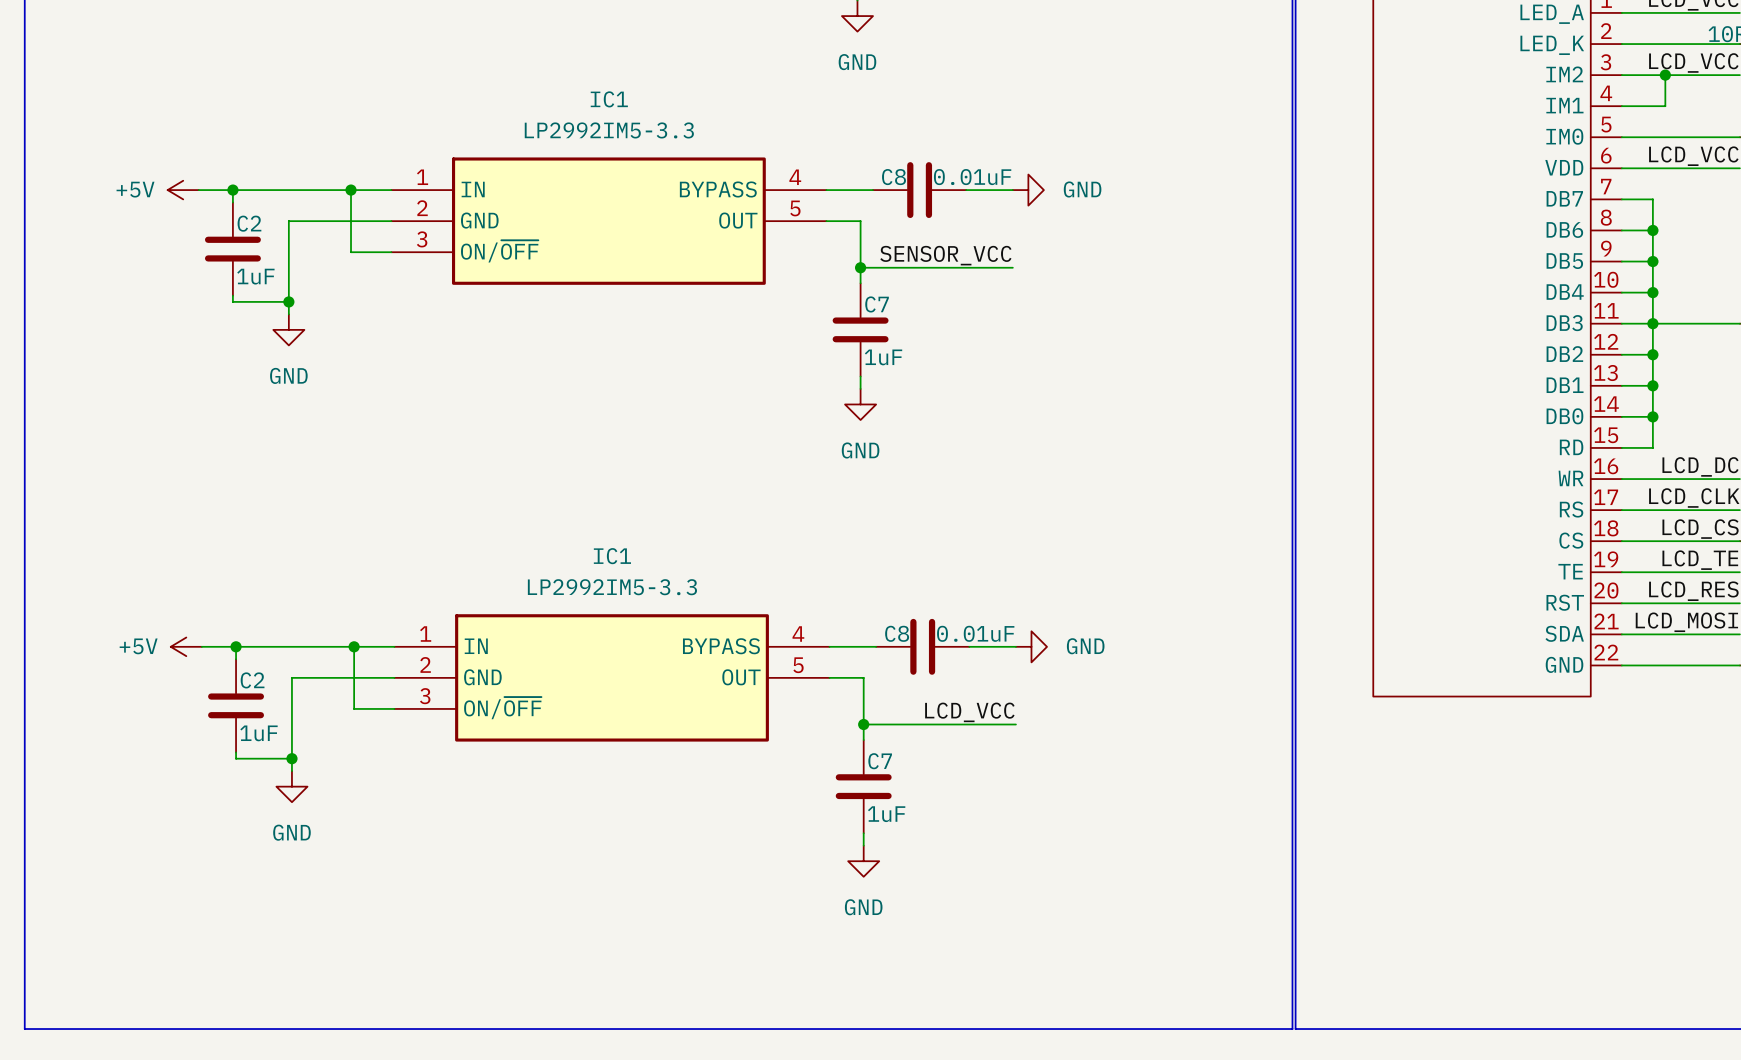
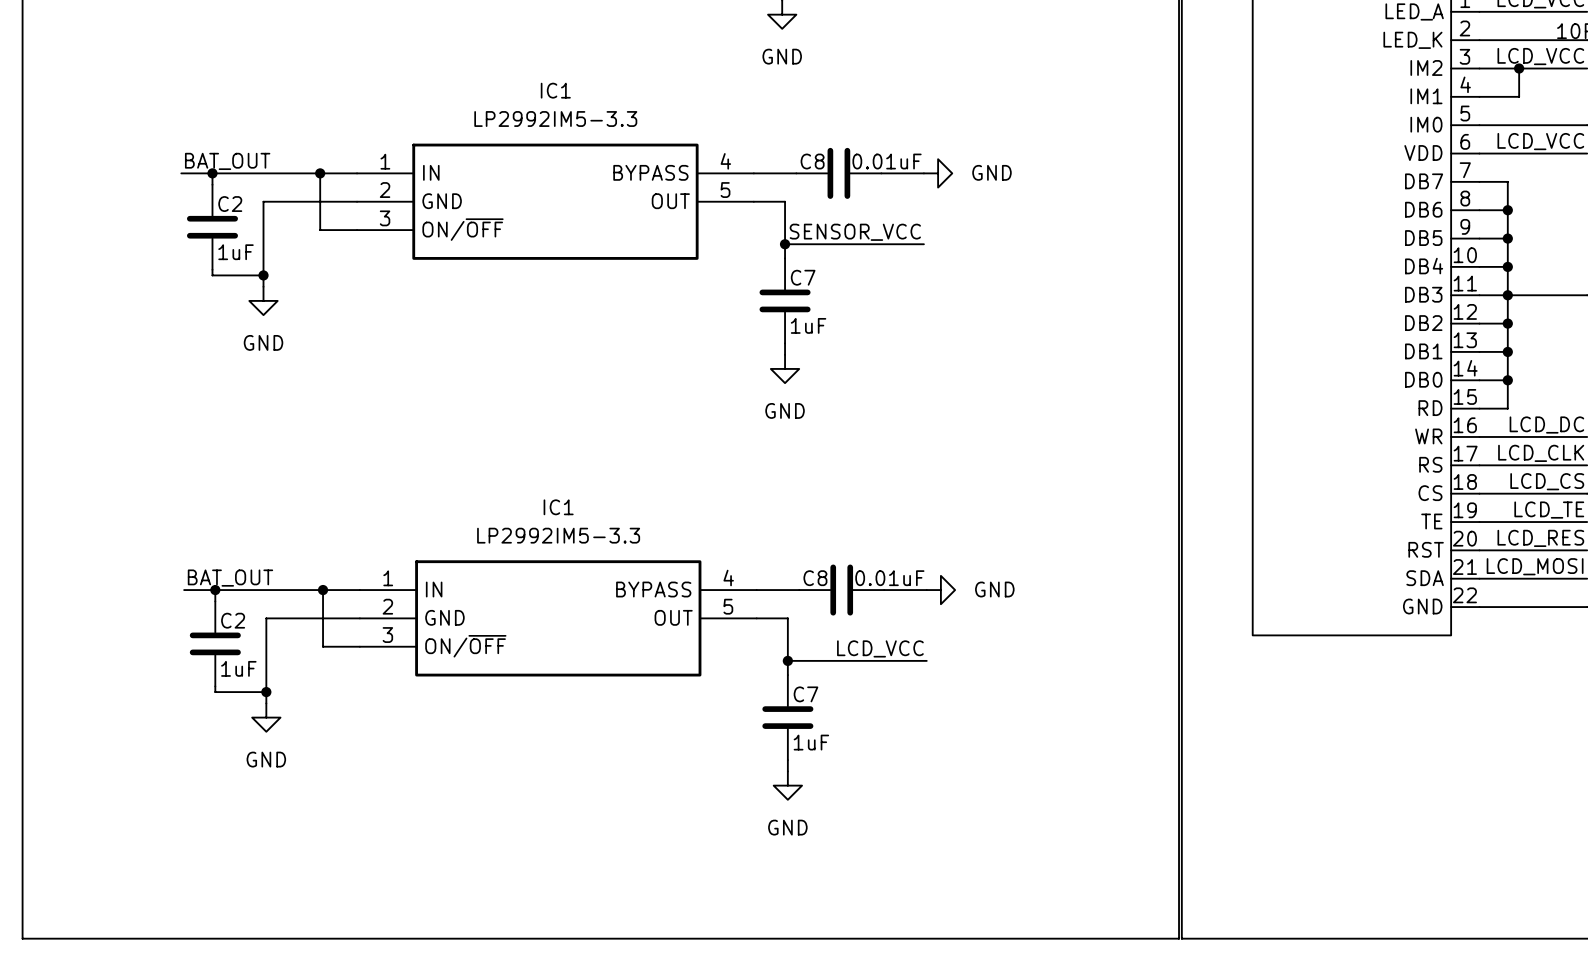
label: none -> BAT_OUT (227, 161)
power symbol: +5V (183, 190) -> none
label: none -> BAT_OUT (230, 578)
power symbol: +5V (186, 646) -> none

